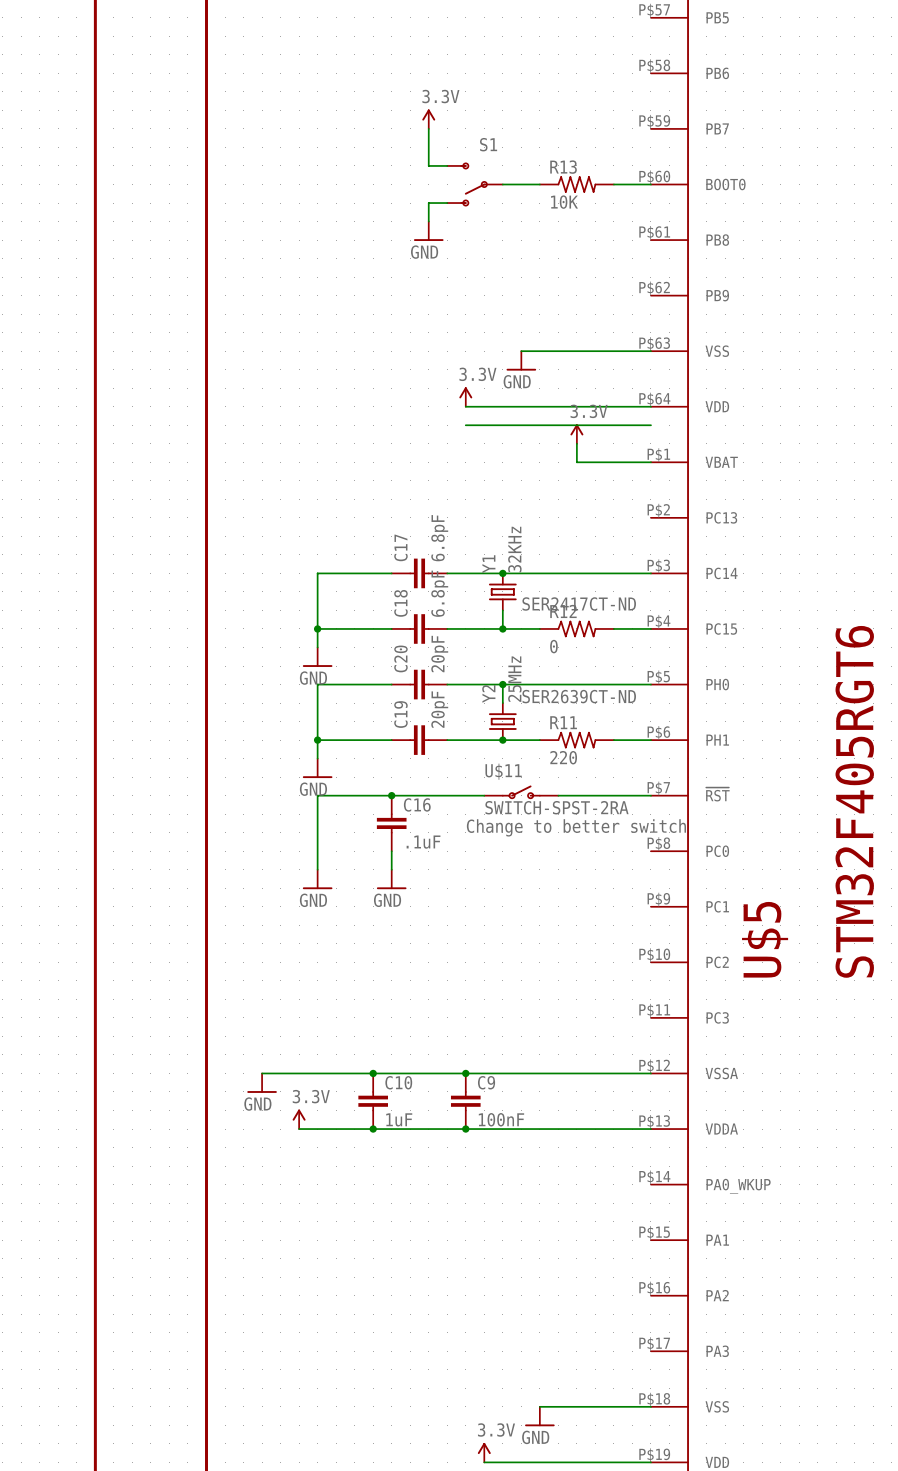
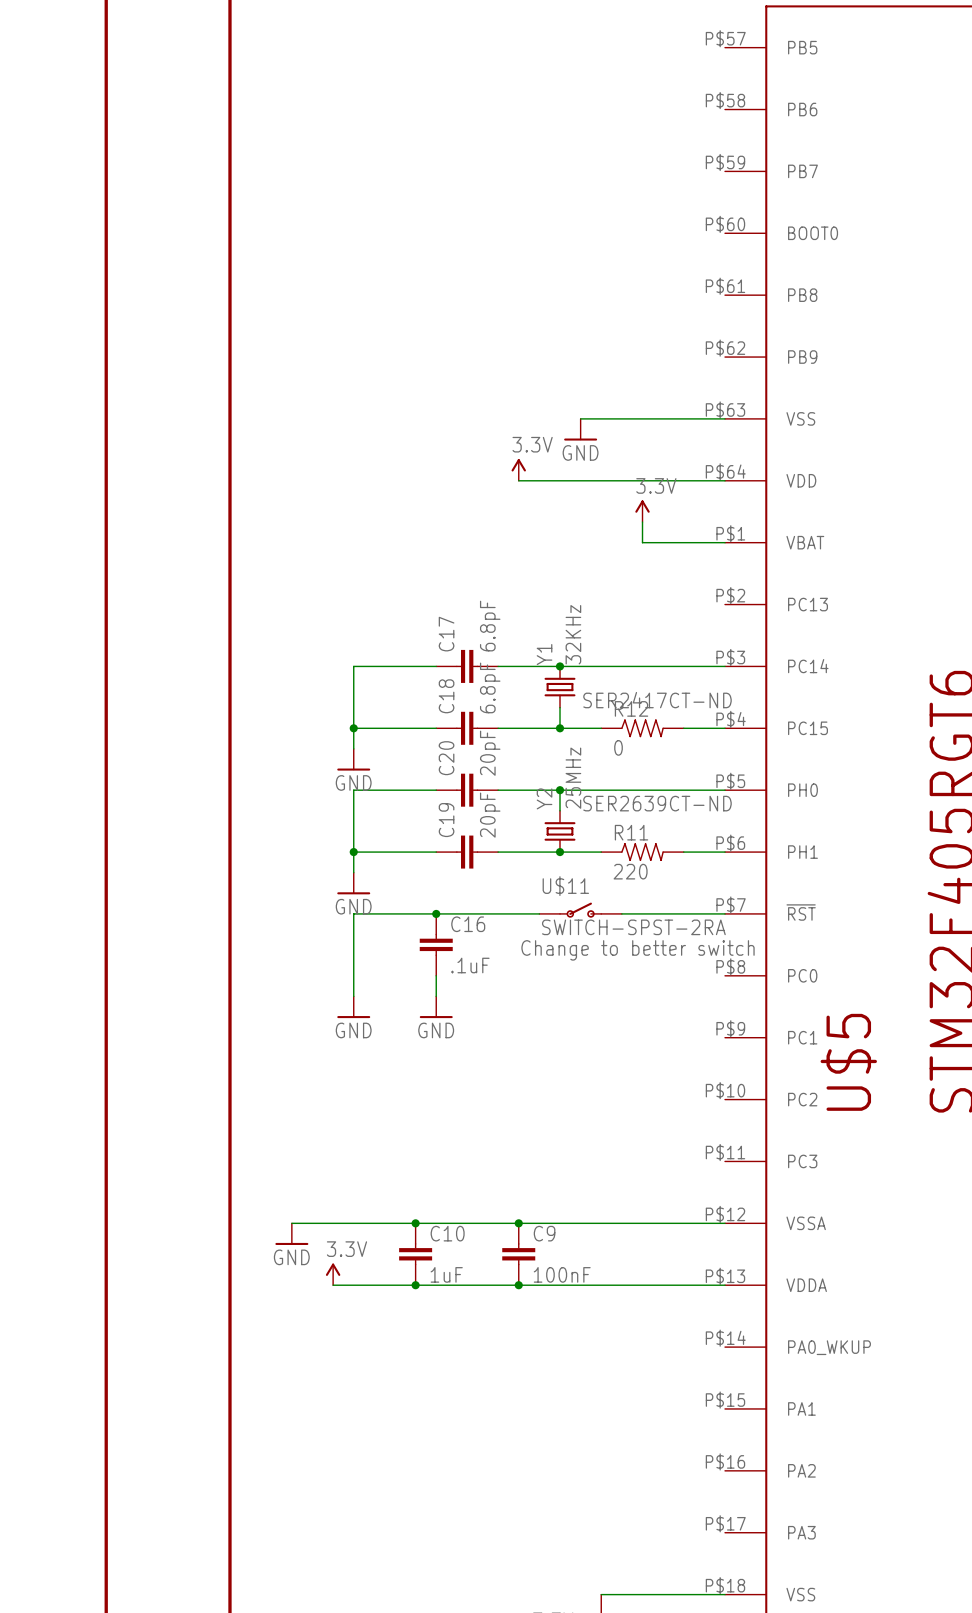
power symbol: 3.3V (428, 119) -> none
wire: (428, 128) (428, 165) (447, 165) -> none
S1: (475, 184) -> none
wire: (502, 184) (539, 184) -> none
R13: 10K (576, 184) -> none
wire: (613, 184) (650, 184) -> none
wire: (447, 203) (428, 203) (428, 221) -> none
power symbol: GND (428, 231) -> none
wire: (465, 425) (650, 425) -> none

